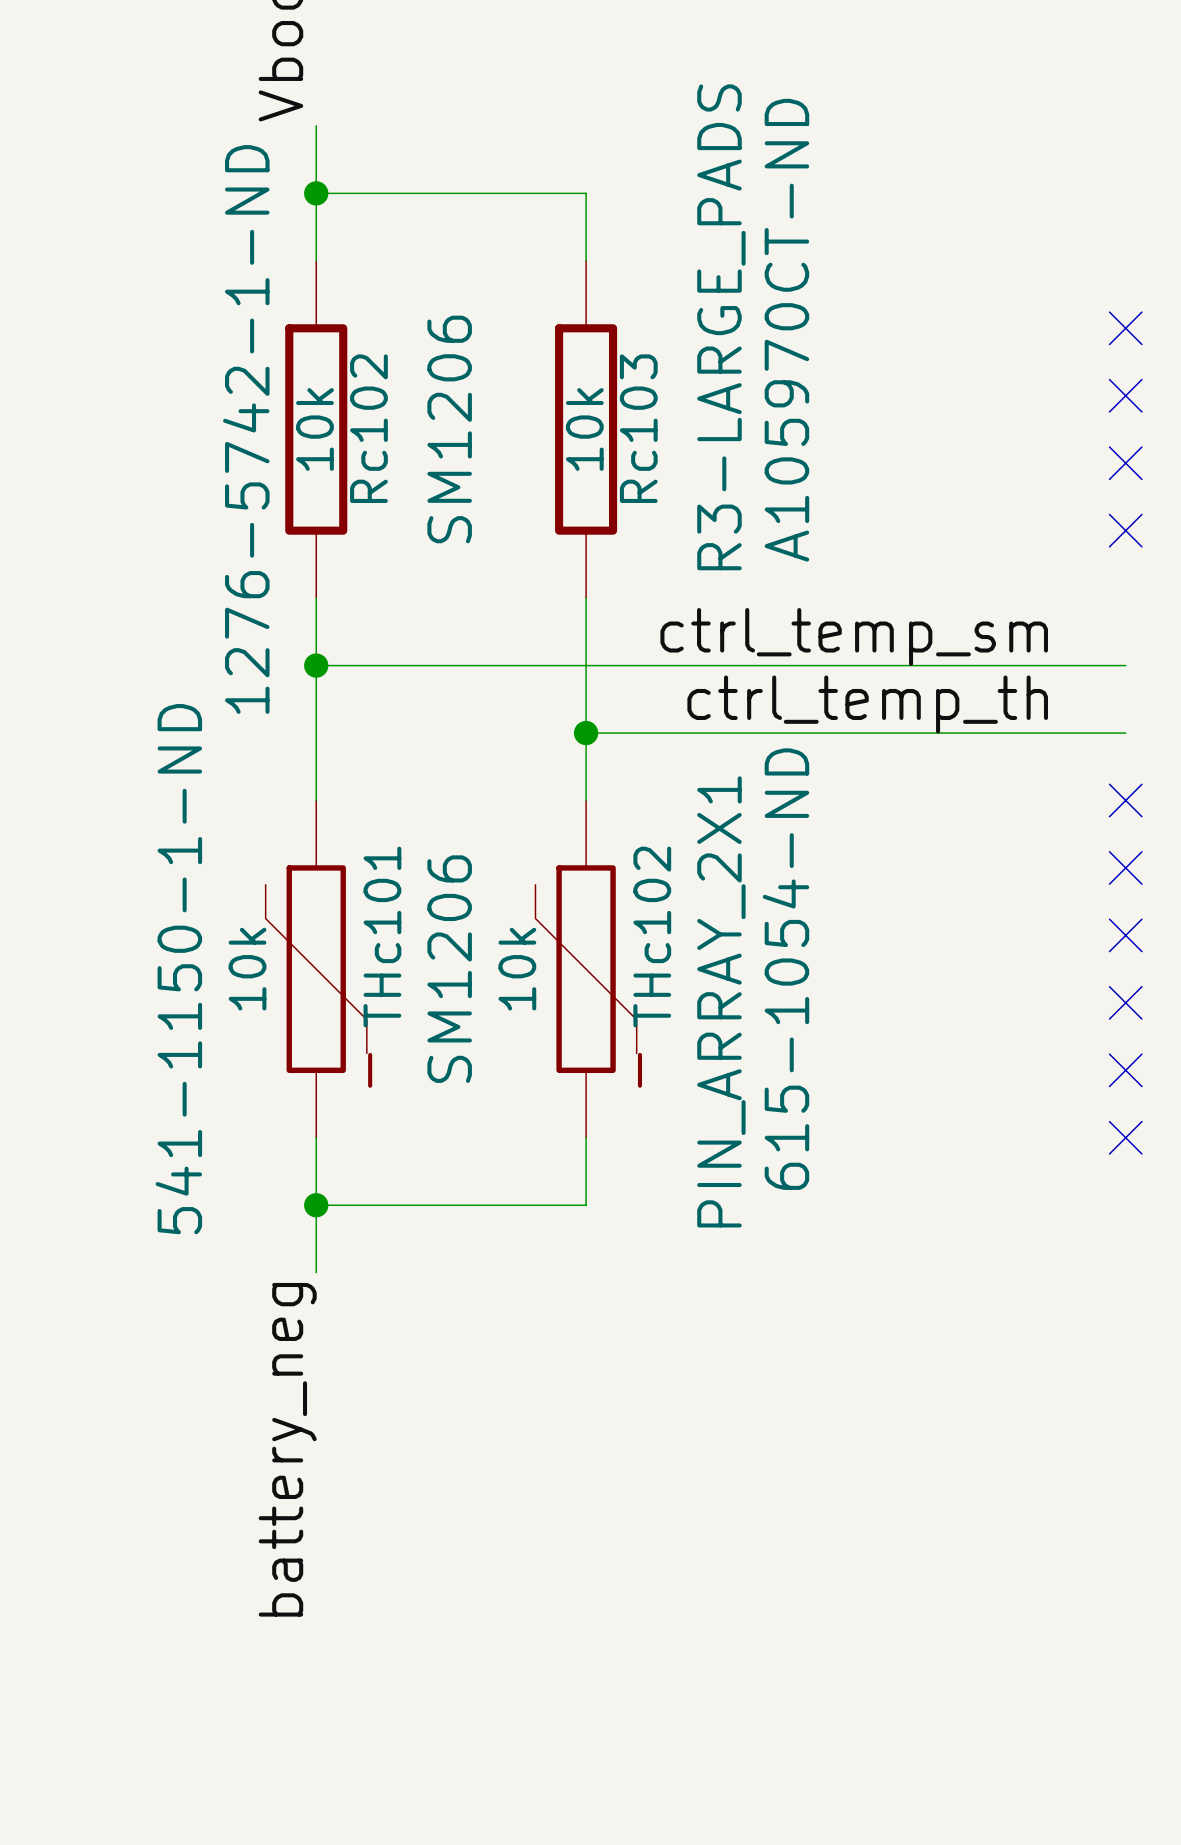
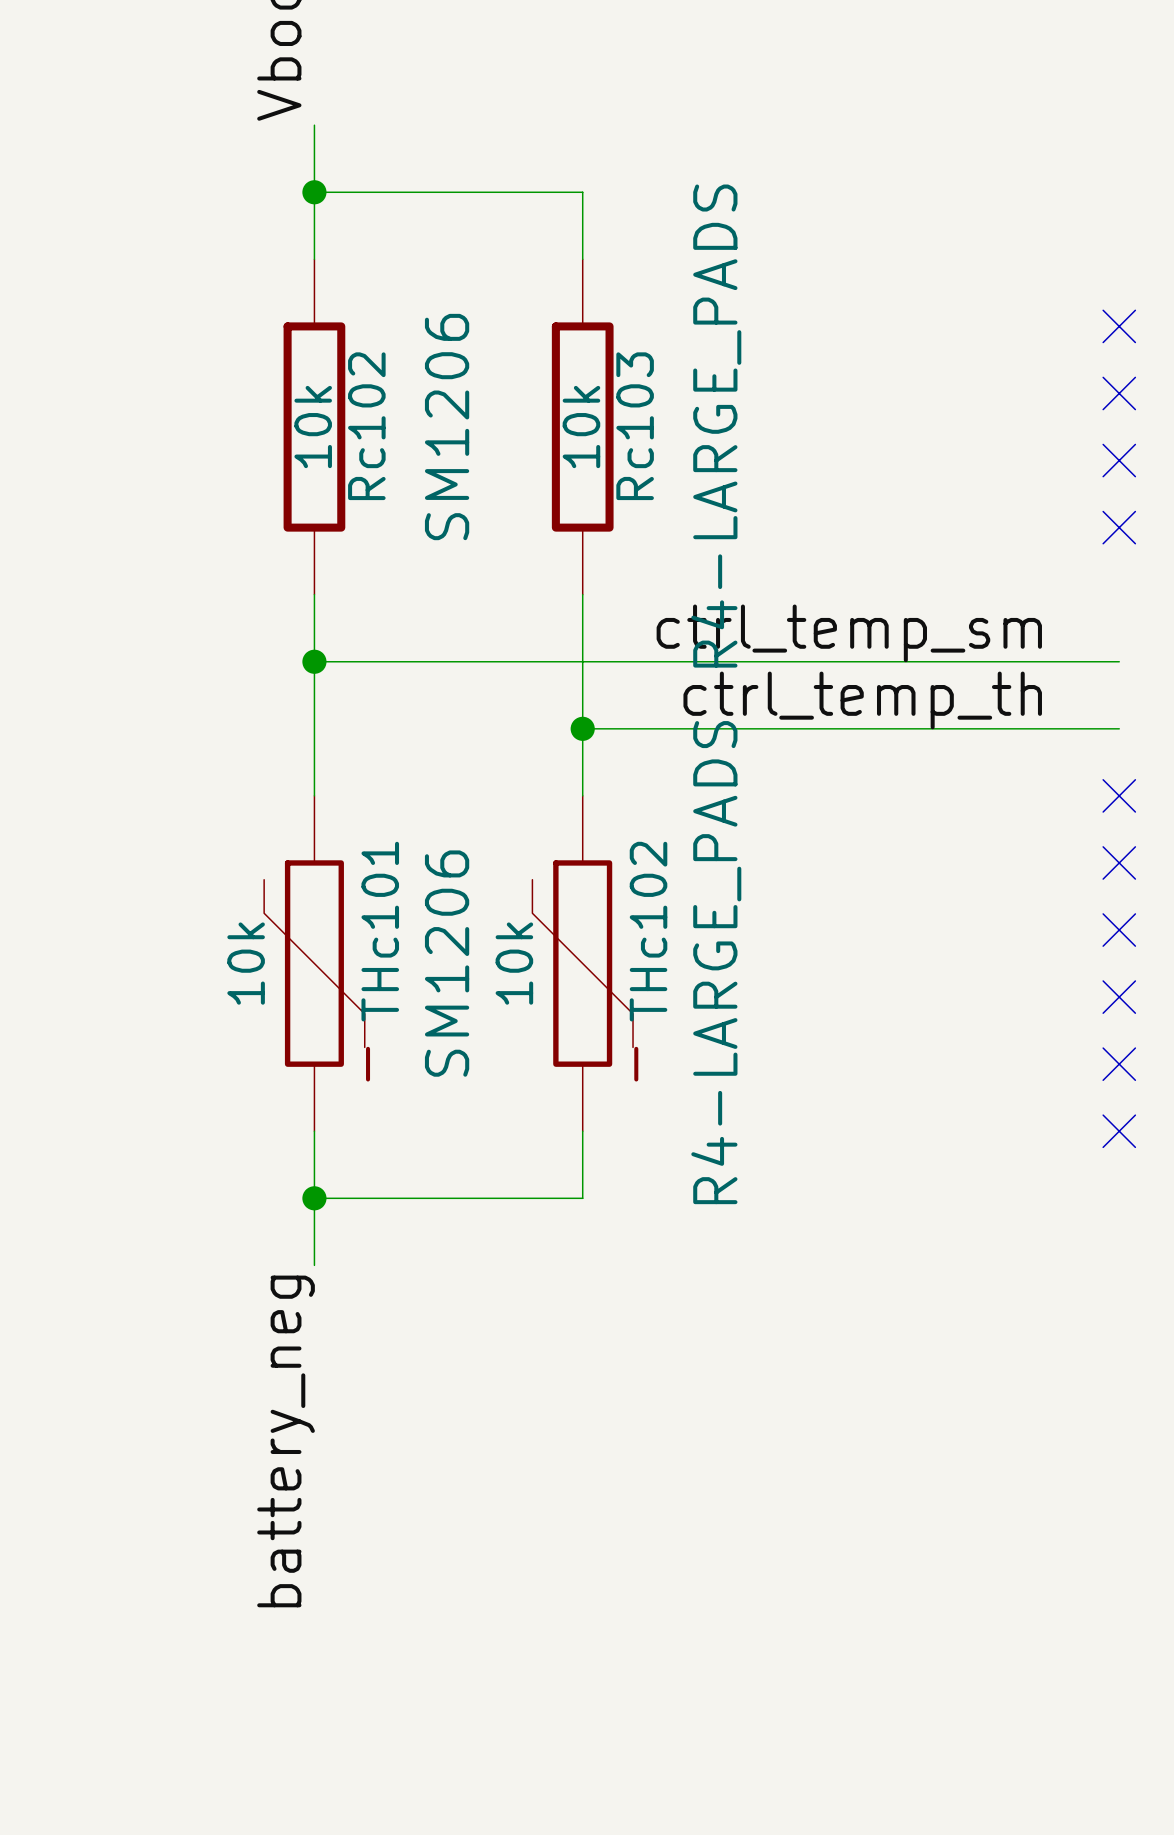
Rc103 text: R3-LARGE_PADS (721, 327) -> R4-LARGE_PADS (716, 426)
Rc103 text: A105970CT-ND (786, 330) -> none
Rc102 text: 1276-5742-1-ND (246, 429) -> none
THc101 text: 541-1150-1-ND (178, 969) -> none
THc102 text: 615-1054-ND (785, 969) -> none
THc102 text: PIN_ARRAY_2X1 (721, 1001) -> R4-LARGE_PADS (716, 962)

